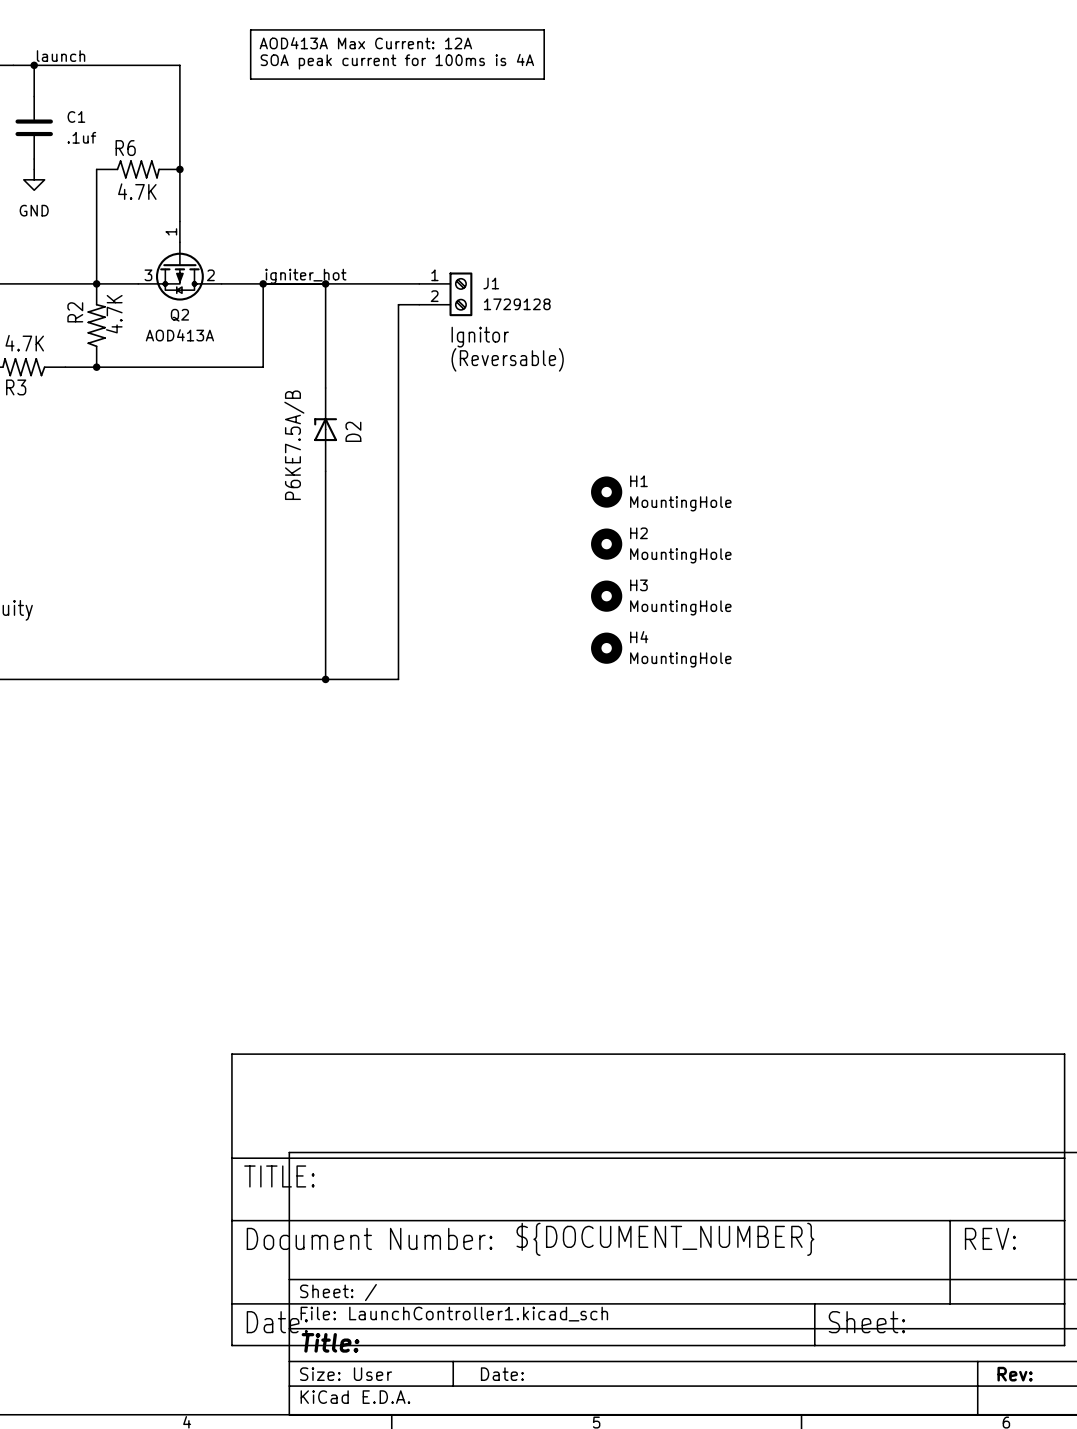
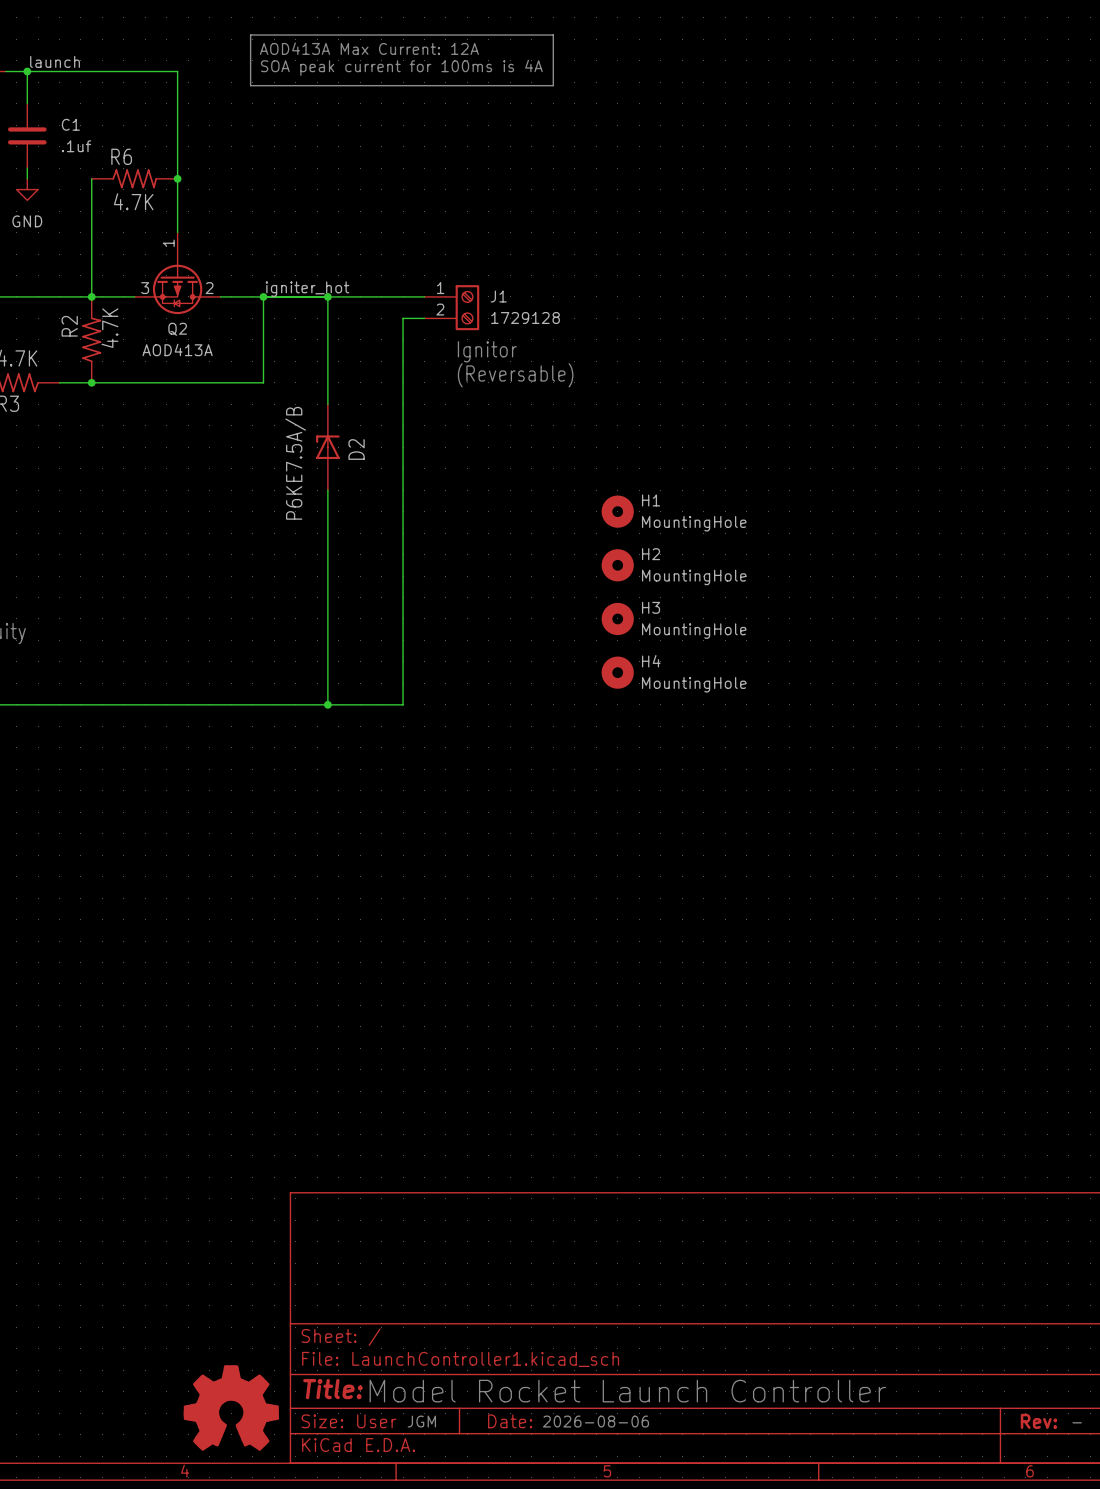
power symbol: (648, 1199) -> none
text: ${DOCUMENT_NUMBER} (665, 1239) -> none
text: none -> Model Rocket Launch Controller (627, 1391)
power symbol: none -> (231, 1407)
text: none -> JGM (421, 1421)
text: none -> 2026-08-06 (596, 1421)
text: none -> - (1077, 1422)

